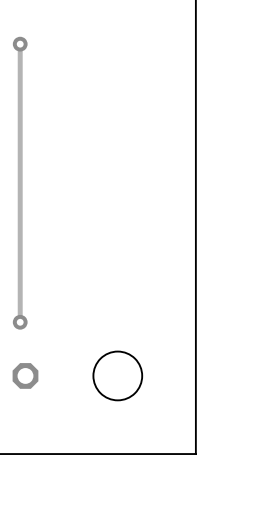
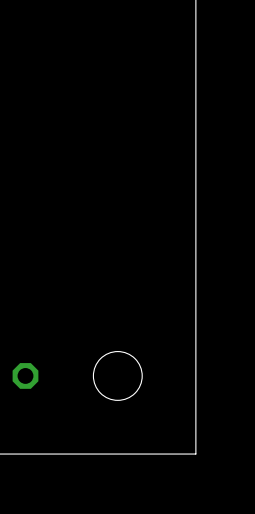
track: (20, 44) (20, 322) -> none
via: (20, 44) -> none
via: (20, 322) -> none

